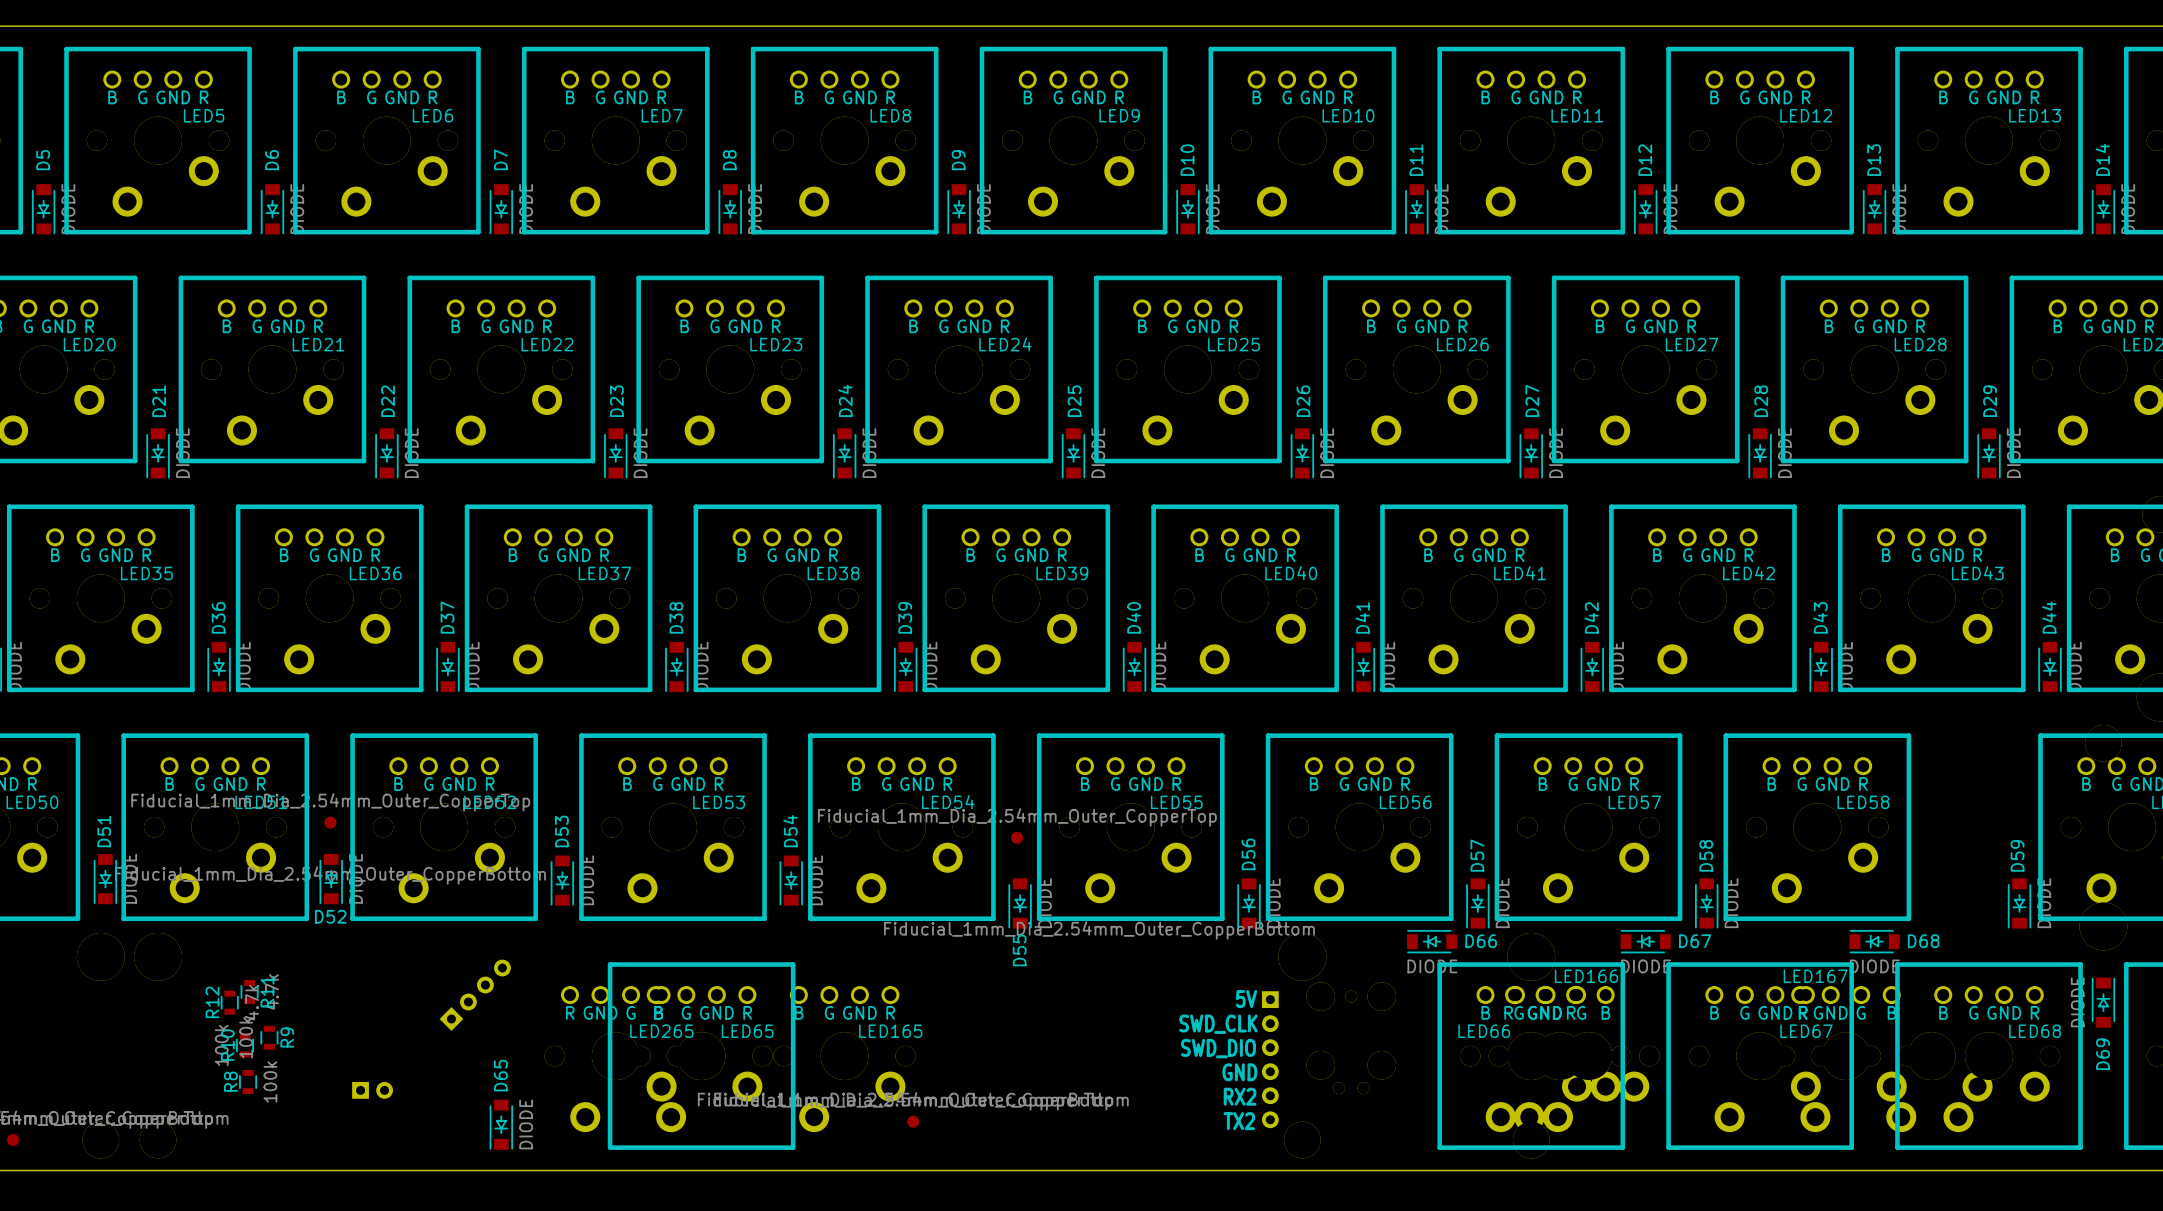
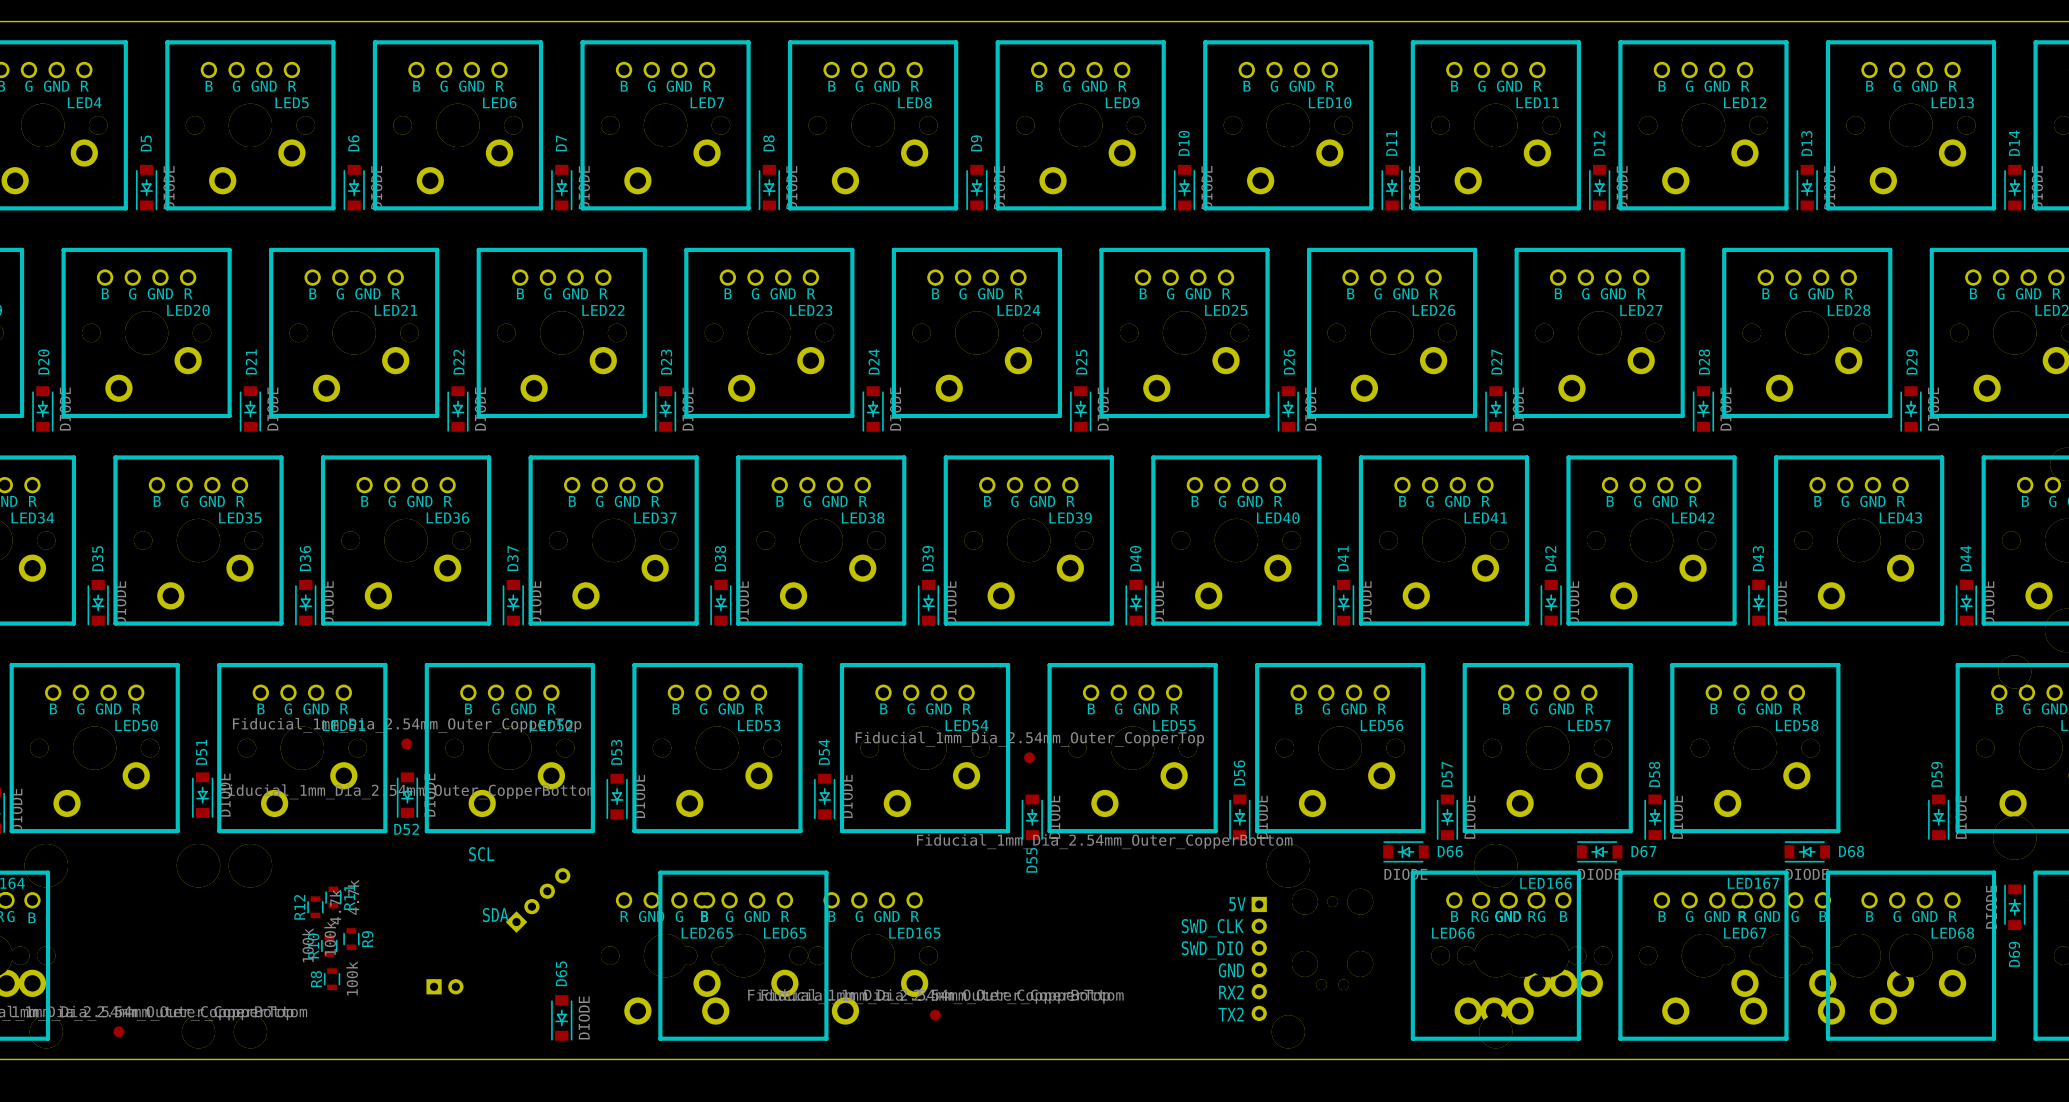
text: none -> SCL (481, 854)
text: none -> SDA (495, 915)

